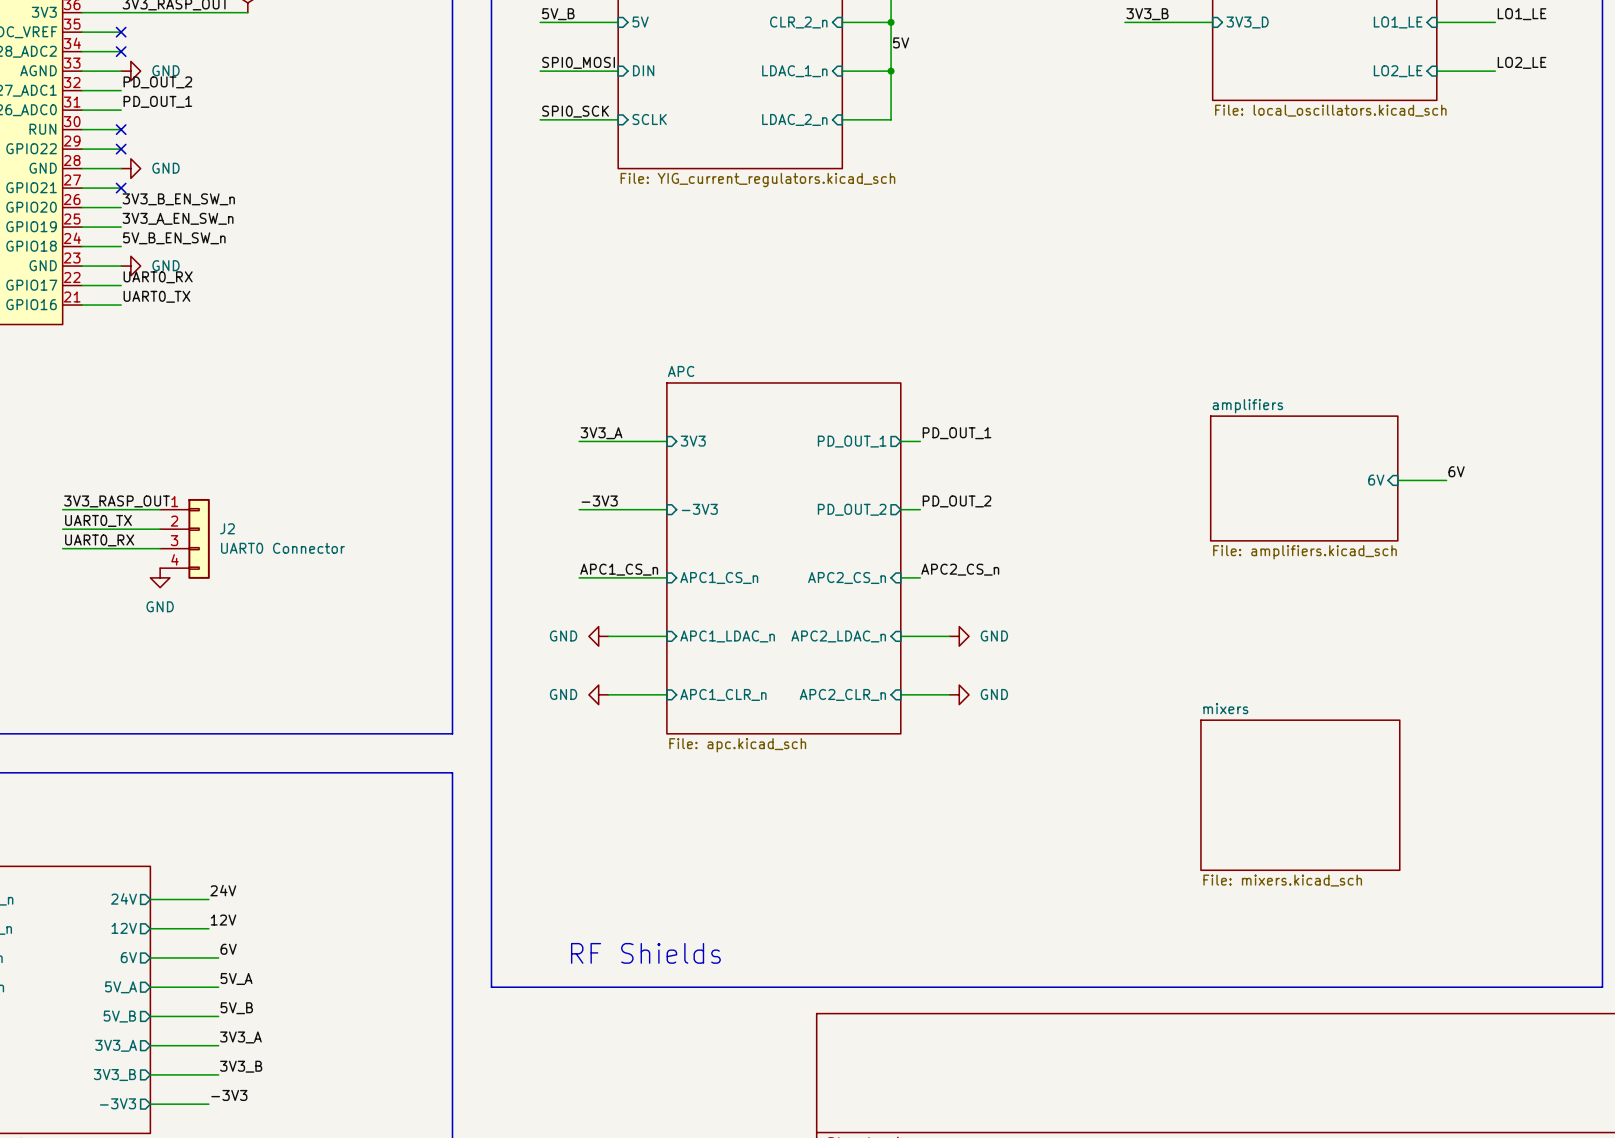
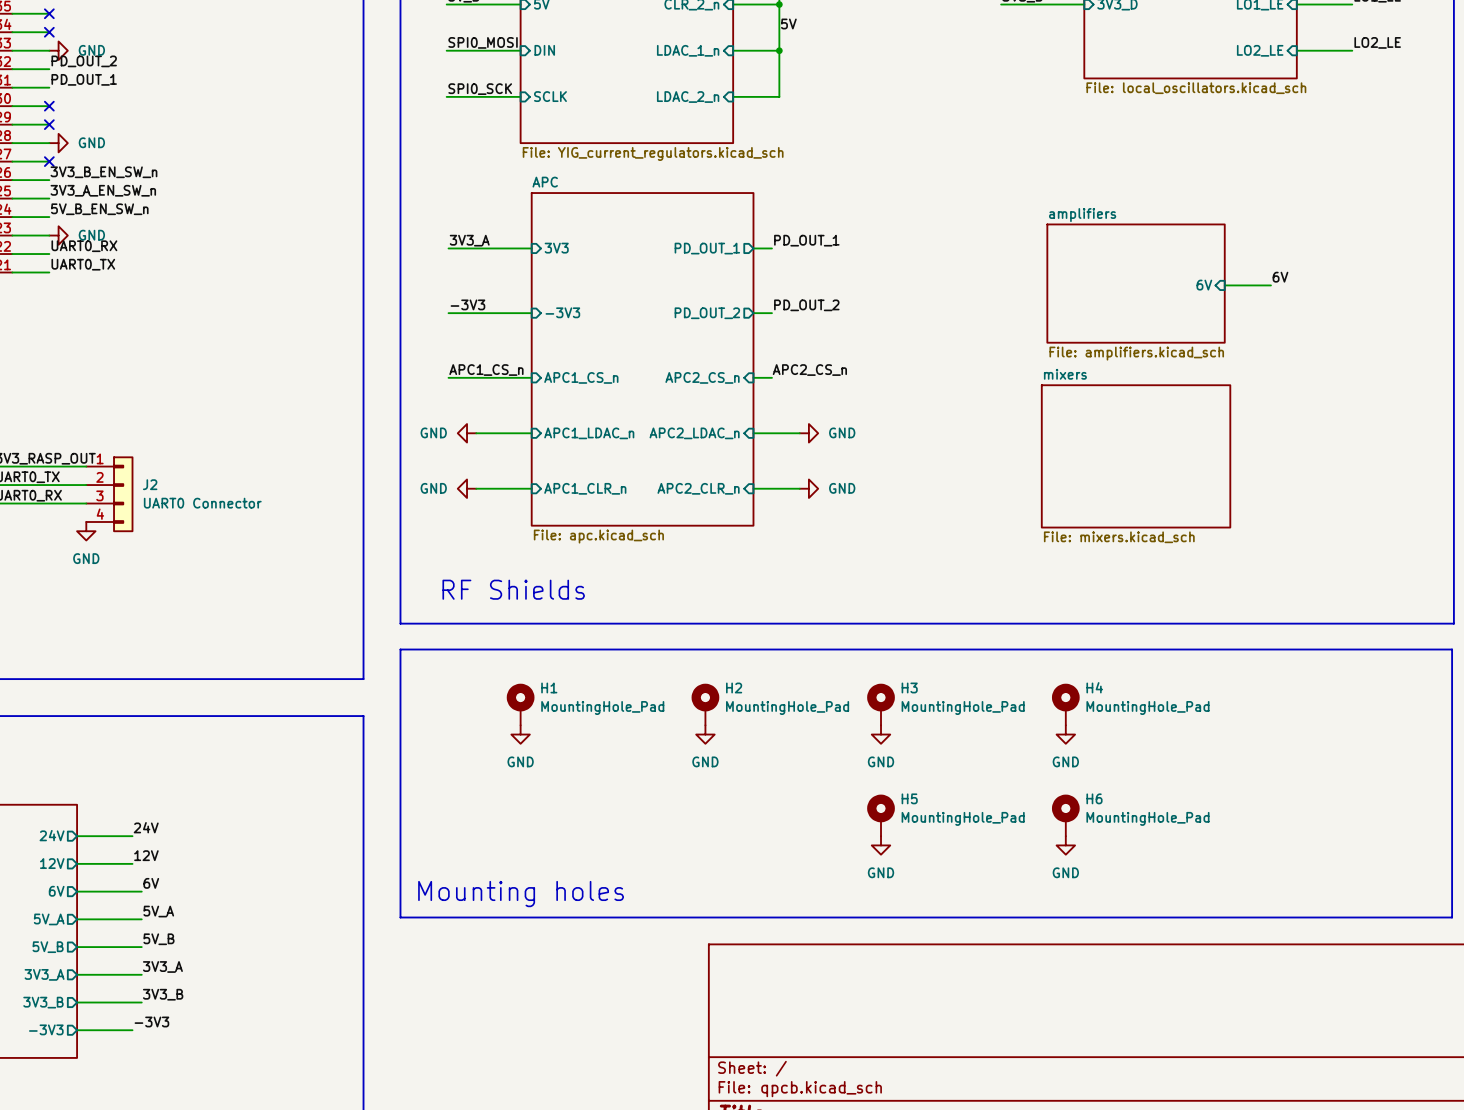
label position: 3V3_A (601, 433) -> 3V3_A (469, 240)
label position: PD_OUT_1 (957, 433) -> PD_OUT_1 (806, 240)
wire: (579, 441) (666, 441) -> (448, 248) (531, 248)
sheet pin position: 3V3 (693, 441) -> 3V3 (556, 248)
sheet pin position: PD_OUT_1 (852, 441) -> PD_OUT_1 (707, 248)
wire: (900, 441) (920, 441) -> (753, 248) (771, 248)
label position: 6V (1456, 471) -> 6V (1280, 277)
power symbol: none -> GND (467, 433)
power symbol: none -> GND (808, 433)
sheet amplifiers position: (1304, 478) -> (1136, 283)
sheet pin position: 6V (1376, 480) -> 6V (1204, 285)
wire: (1397, 480) (1446, 480) -> (1224, 285) (1270, 285)
sheet mixers: none -> File: mixers.kicad_sch (1136, 456)
label position: -3V3 (599, 500) -> -3V3 (467, 304)
label position: PD_OUT_2 (957, 501) -> PD_OUT_2 (806, 305)
wire: (579, 509) (666, 509) -> (448, 313) (531, 313)
sheet pin position: -3V3 (699, 509) -> -3V3 (562, 312)
sheet pin position: PD_OUT_2 (852, 509) -> PD_OUT_2 (707, 313)
wire: (900, 509) (920, 509) -> (753, 313) (771, 313)
power symbol: none -> GND (467, 488)
power symbol: none -> GND (808, 488)
sheet APC position: (783, 558) -> (642, 359)
label position: APC1_CS_n (619, 569) -> APC1_CS_n (486, 370)
label position: APC2_CS_n (960, 569) -> APC2_CS_n (809, 370)
wire: (579, 577) (666, 577) -> (448, 377) (531, 377)
wire: (900, 577) (920, 577) -> (753, 377) (771, 377)
sheet pin position: APC1_CS_n (719, 578) -> APC1_CS_n (581, 377)
sheet pin position: APC2_CS_n (847, 578) -> APC2_CS_n (702, 377)
power symbol: GND (598, 636) -> none
wire: (608, 636) (666, 636) -> (476, 433) (531, 433)
sheet pin position: APC1_LDAC_n (727, 636) -> APC1_LDAC_n (589, 433)
sheet pin position: APC2_LDAC_n (838, 636) -> APC2_LDAC_n (694, 433)
wire: (900, 636) (949, 636) -> (753, 433) (799, 433)
power symbol: GND (959, 636) -> none
text: none -> RF Shields (513, 589)
line: (491, 675) (491, 702) -> (400, 917) (1452, 917) (1452, 649) (400, 649)
line: (1602, 675) (1602, 987) (491, 987) (491, 985) -> (1453, 623) (400, 623)
power symbol: GND (598, 694) -> none
wire: (608, 694) (666, 694) -> (476, 488) (531, 488)
sheet pin position: APC1_CLR_n (723, 694) -> APC1_CLR_n (585, 488)
sheet pin position: APC2_CLR_n (842, 694) -> APC2_CLR_n (698, 488)
wire: (900, 694) (949, 694) -> (753, 488) (799, 488)
power symbol: GND (959, 694) -> none
H1: none -> MountingHole_Pad (520, 704)
H2: none -> MountingHole_Pad (705, 704)
H3: none -> MountingHole_Pad (881, 704)
H4: none -> MountingHole_Pad (1065, 704)
power symbol: none -> GND (520, 734)
power symbol: none -> GND (705, 734)
power symbol: none -> GND (881, 734)
power symbol: none -> GND (1065, 734)
sheet mixers: File: mixers.kicad_sch (1300, 795) -> none
H5: none -> MountingHole_Pad (881, 815)
H6: none -> MountingHole_Pad (1065, 815)
power symbol: none -> GND (881, 845)
power symbol: none -> GND (1065, 845)
text: RF Shields (645, 953) -> none
text: none -> Mounting holes (521, 894)

